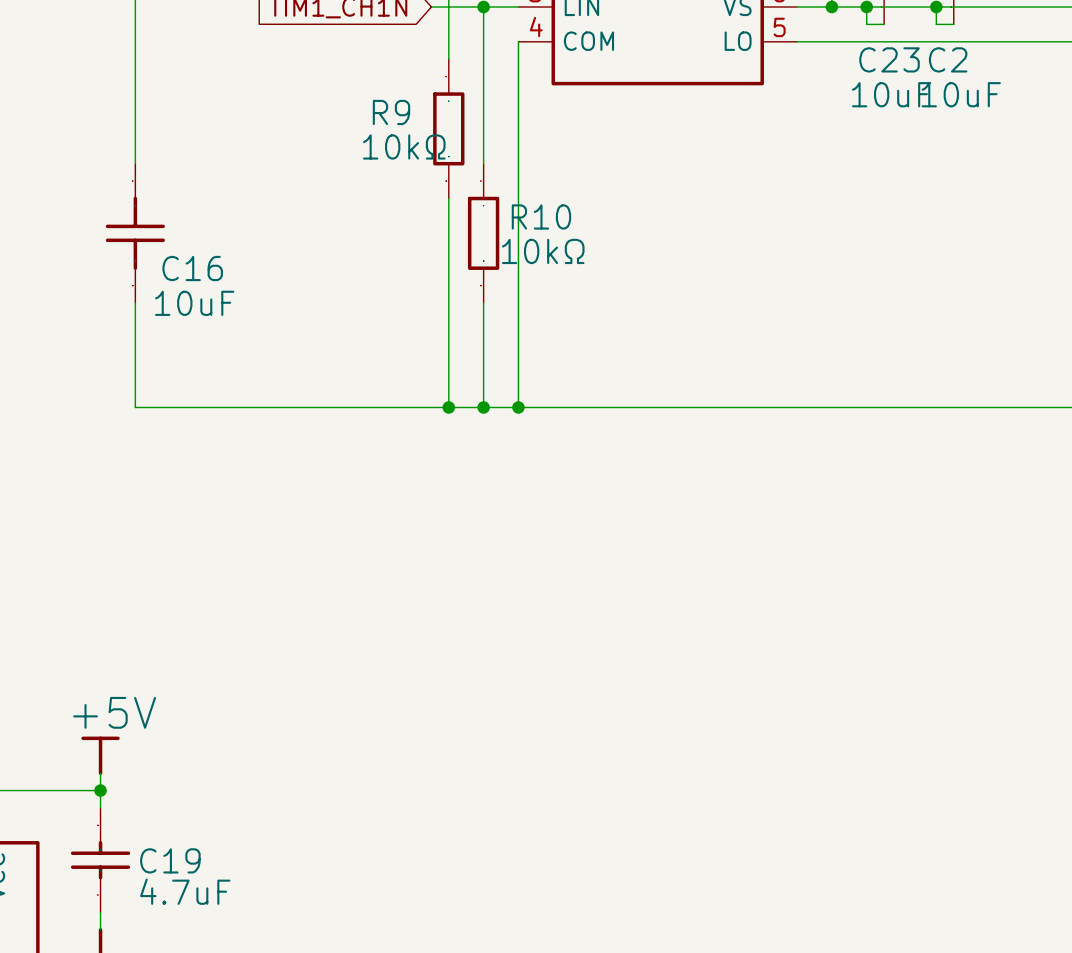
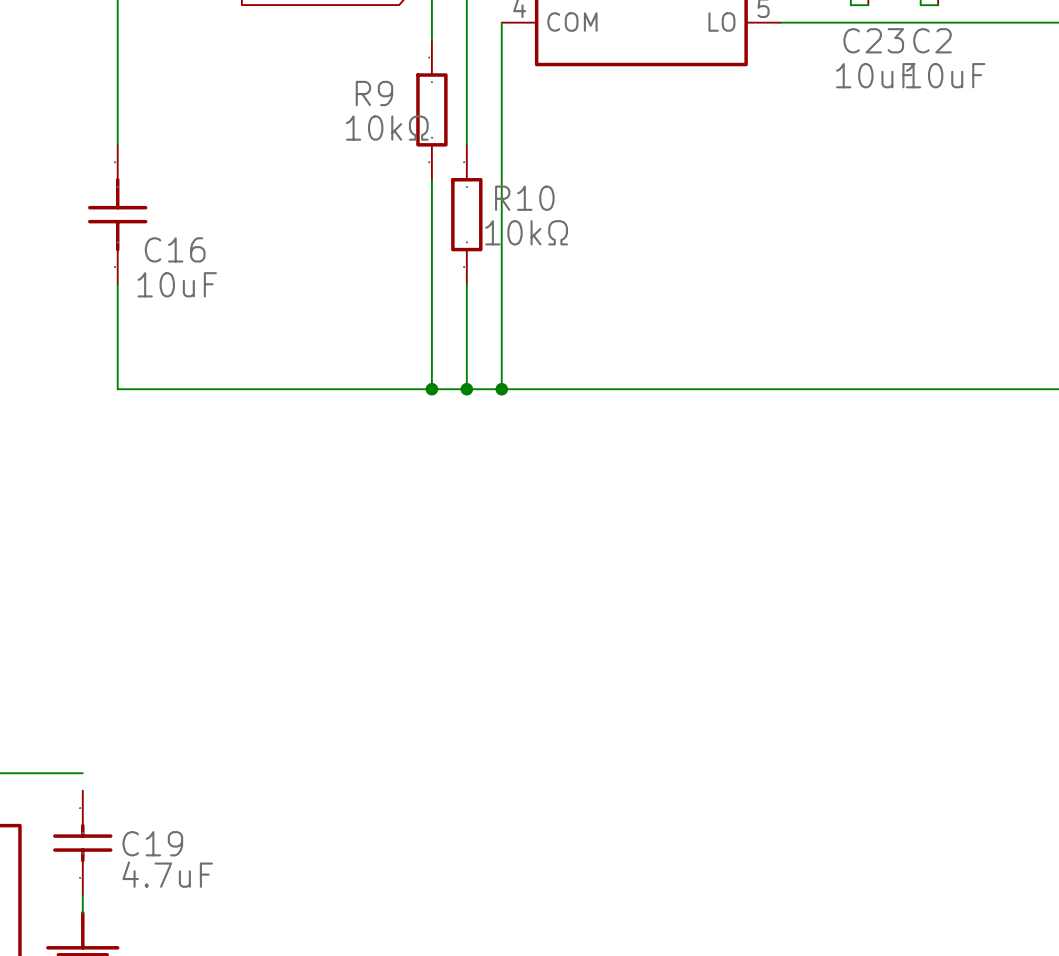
power symbol: +5V (100, 755) -> none
wire: (100, 773) (100, 807) -> none
junction: (100, 790) -> none

